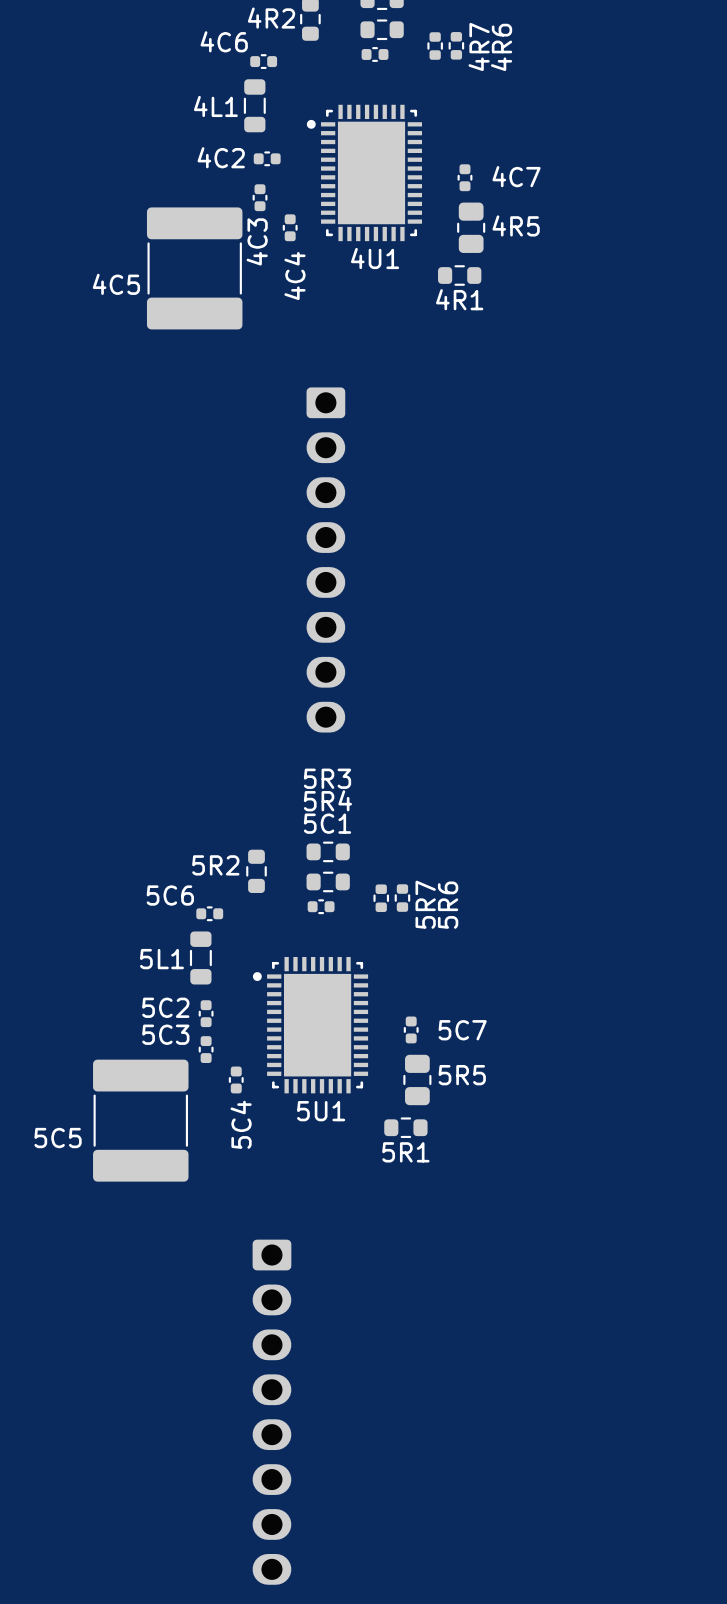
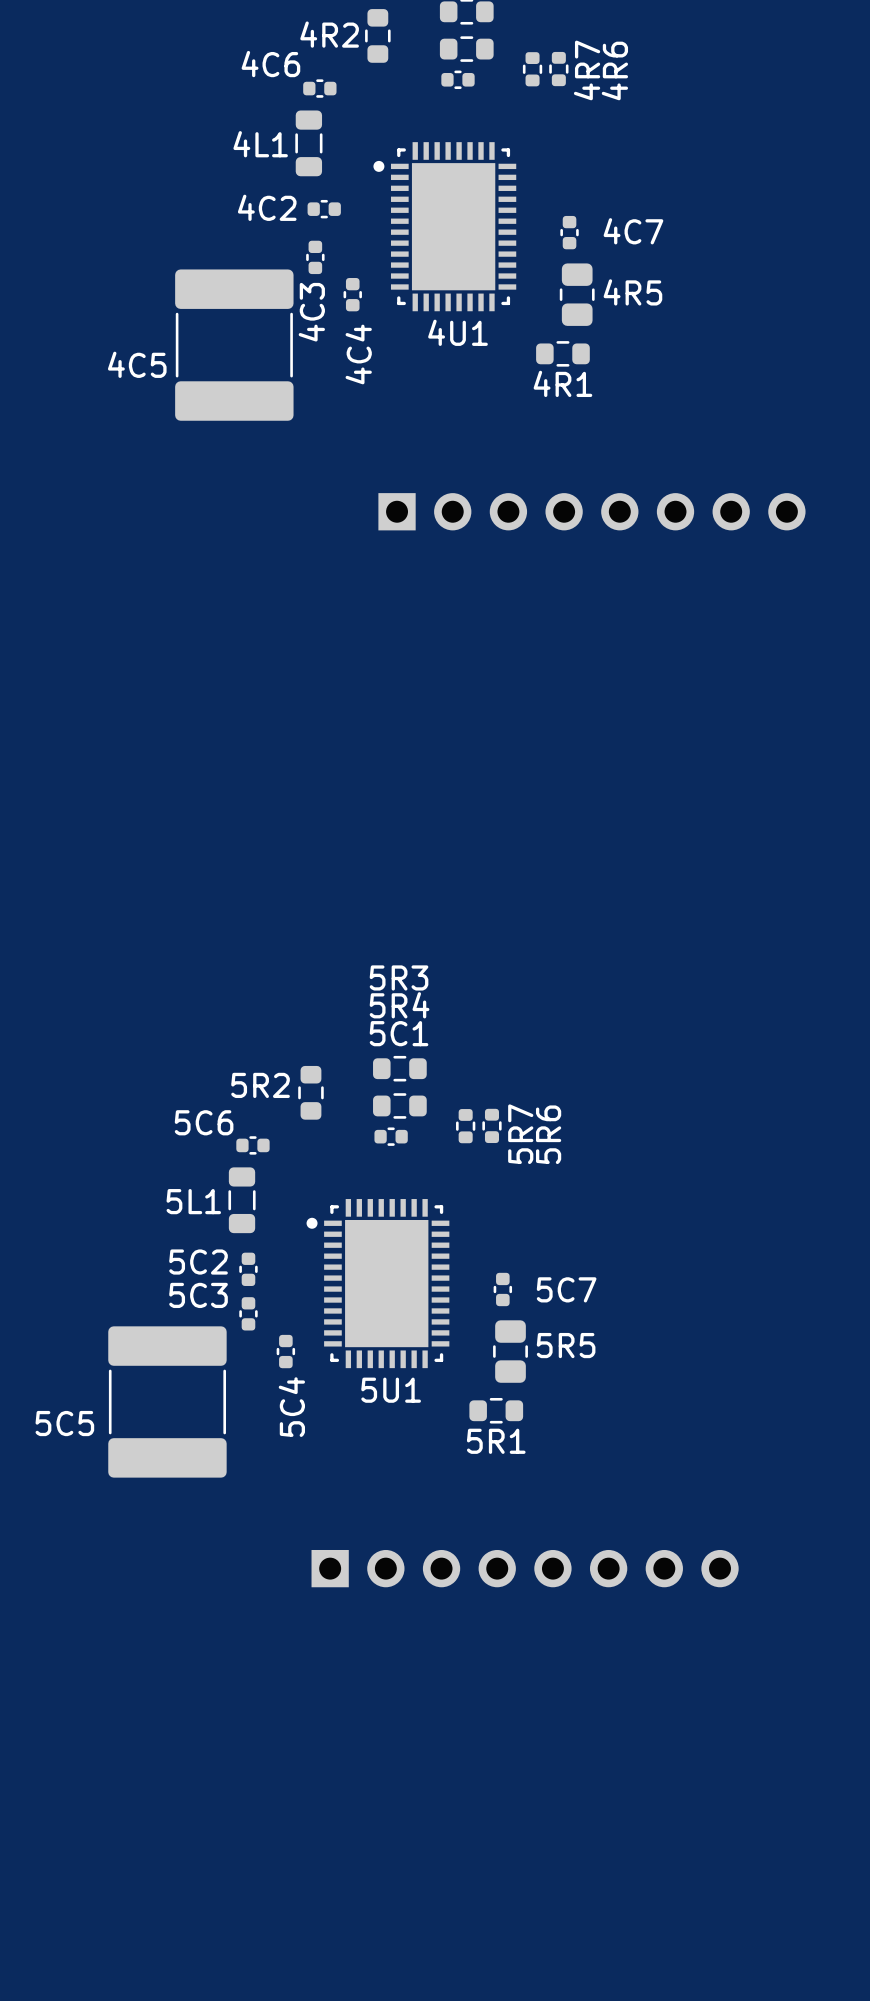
part: none -> (591, 511)
part: (325, 559) -> none
part: none -> (525, 1568)
part: (271, 1412) -> none

